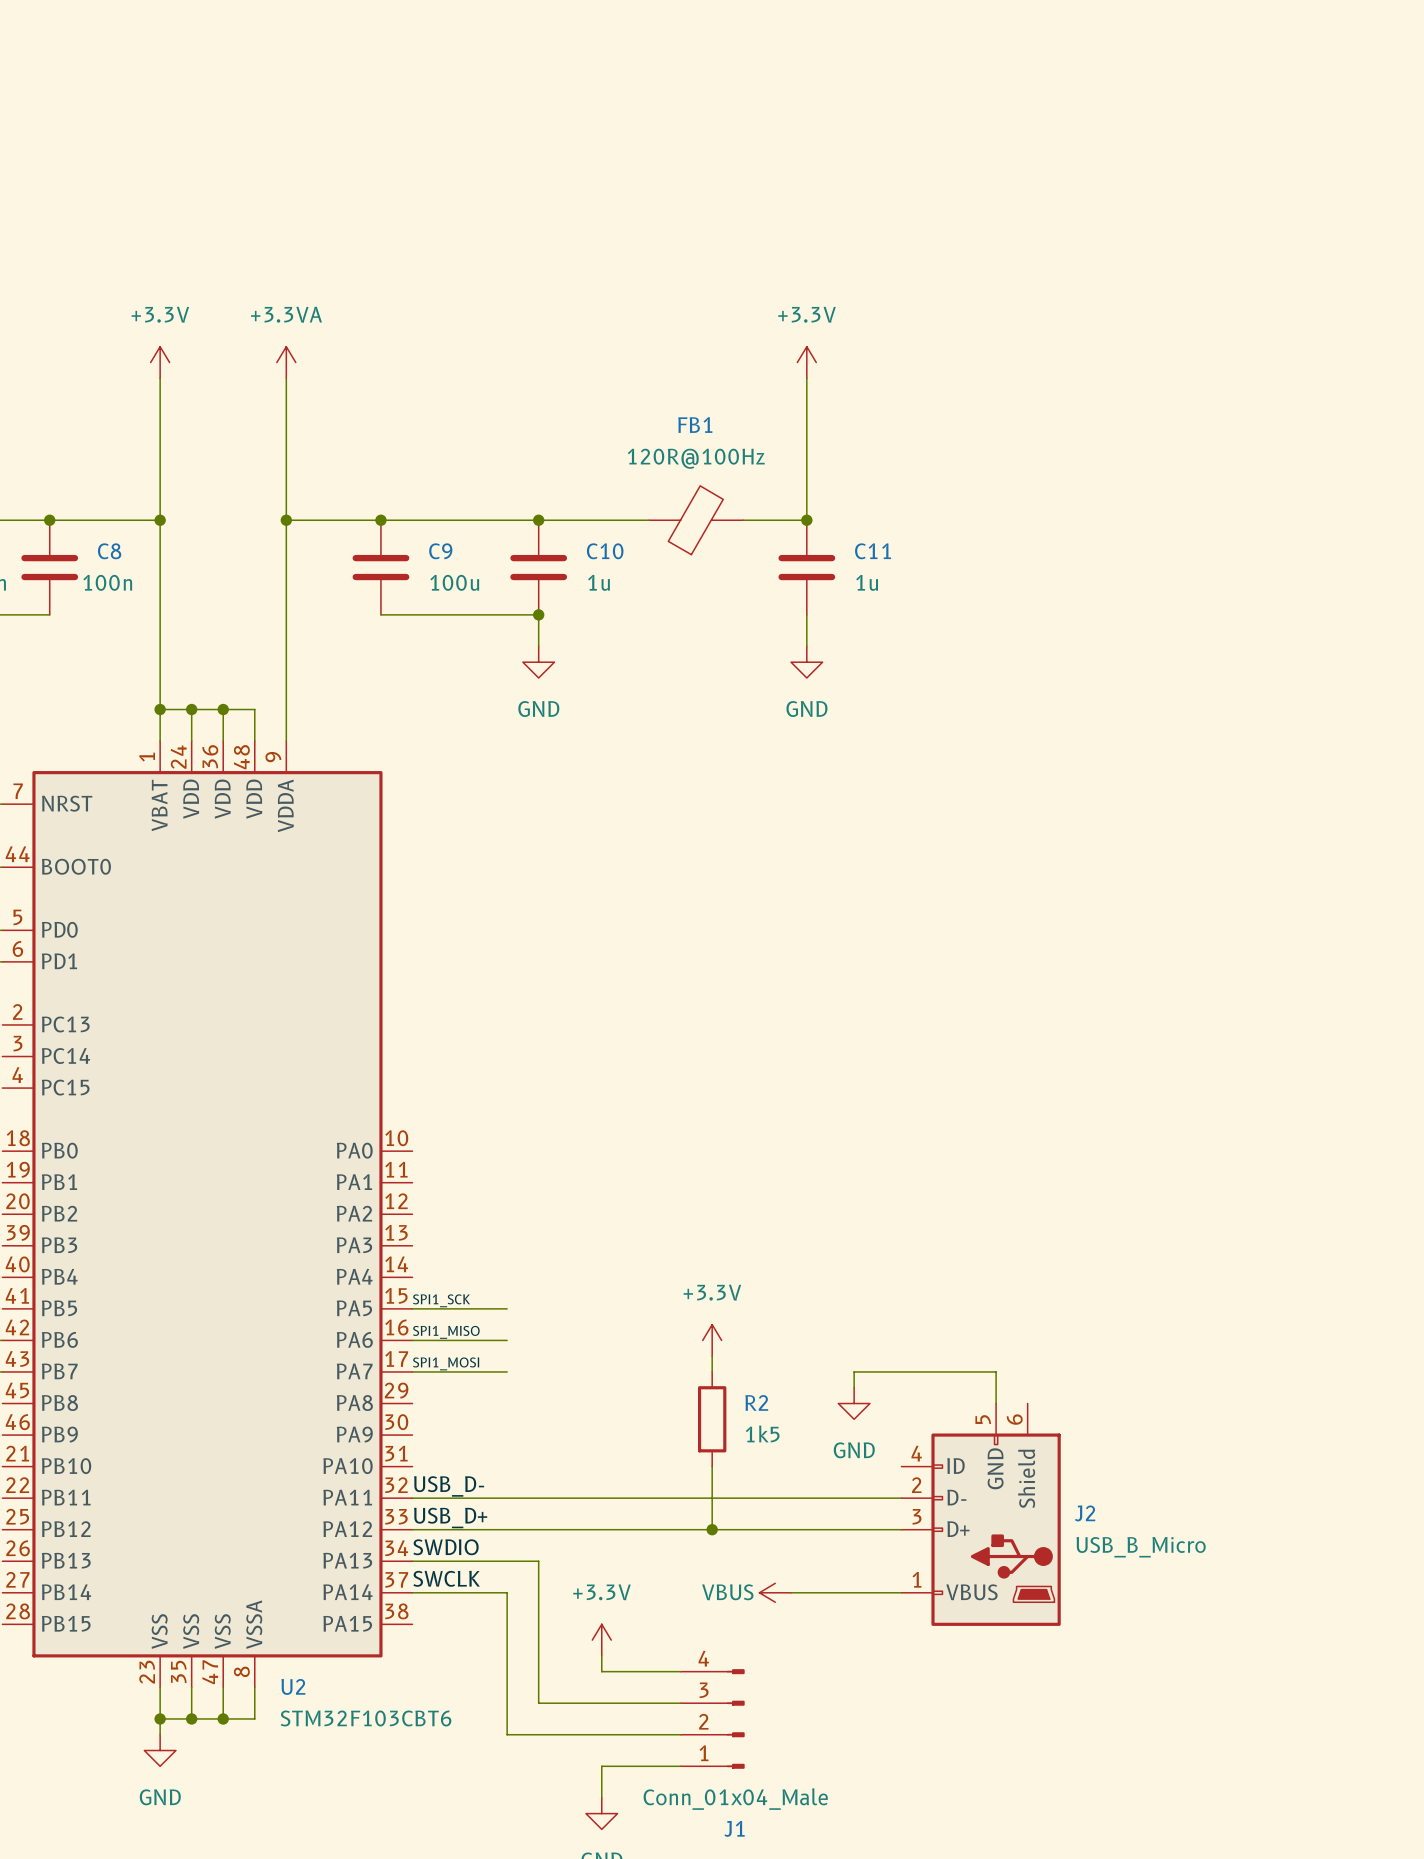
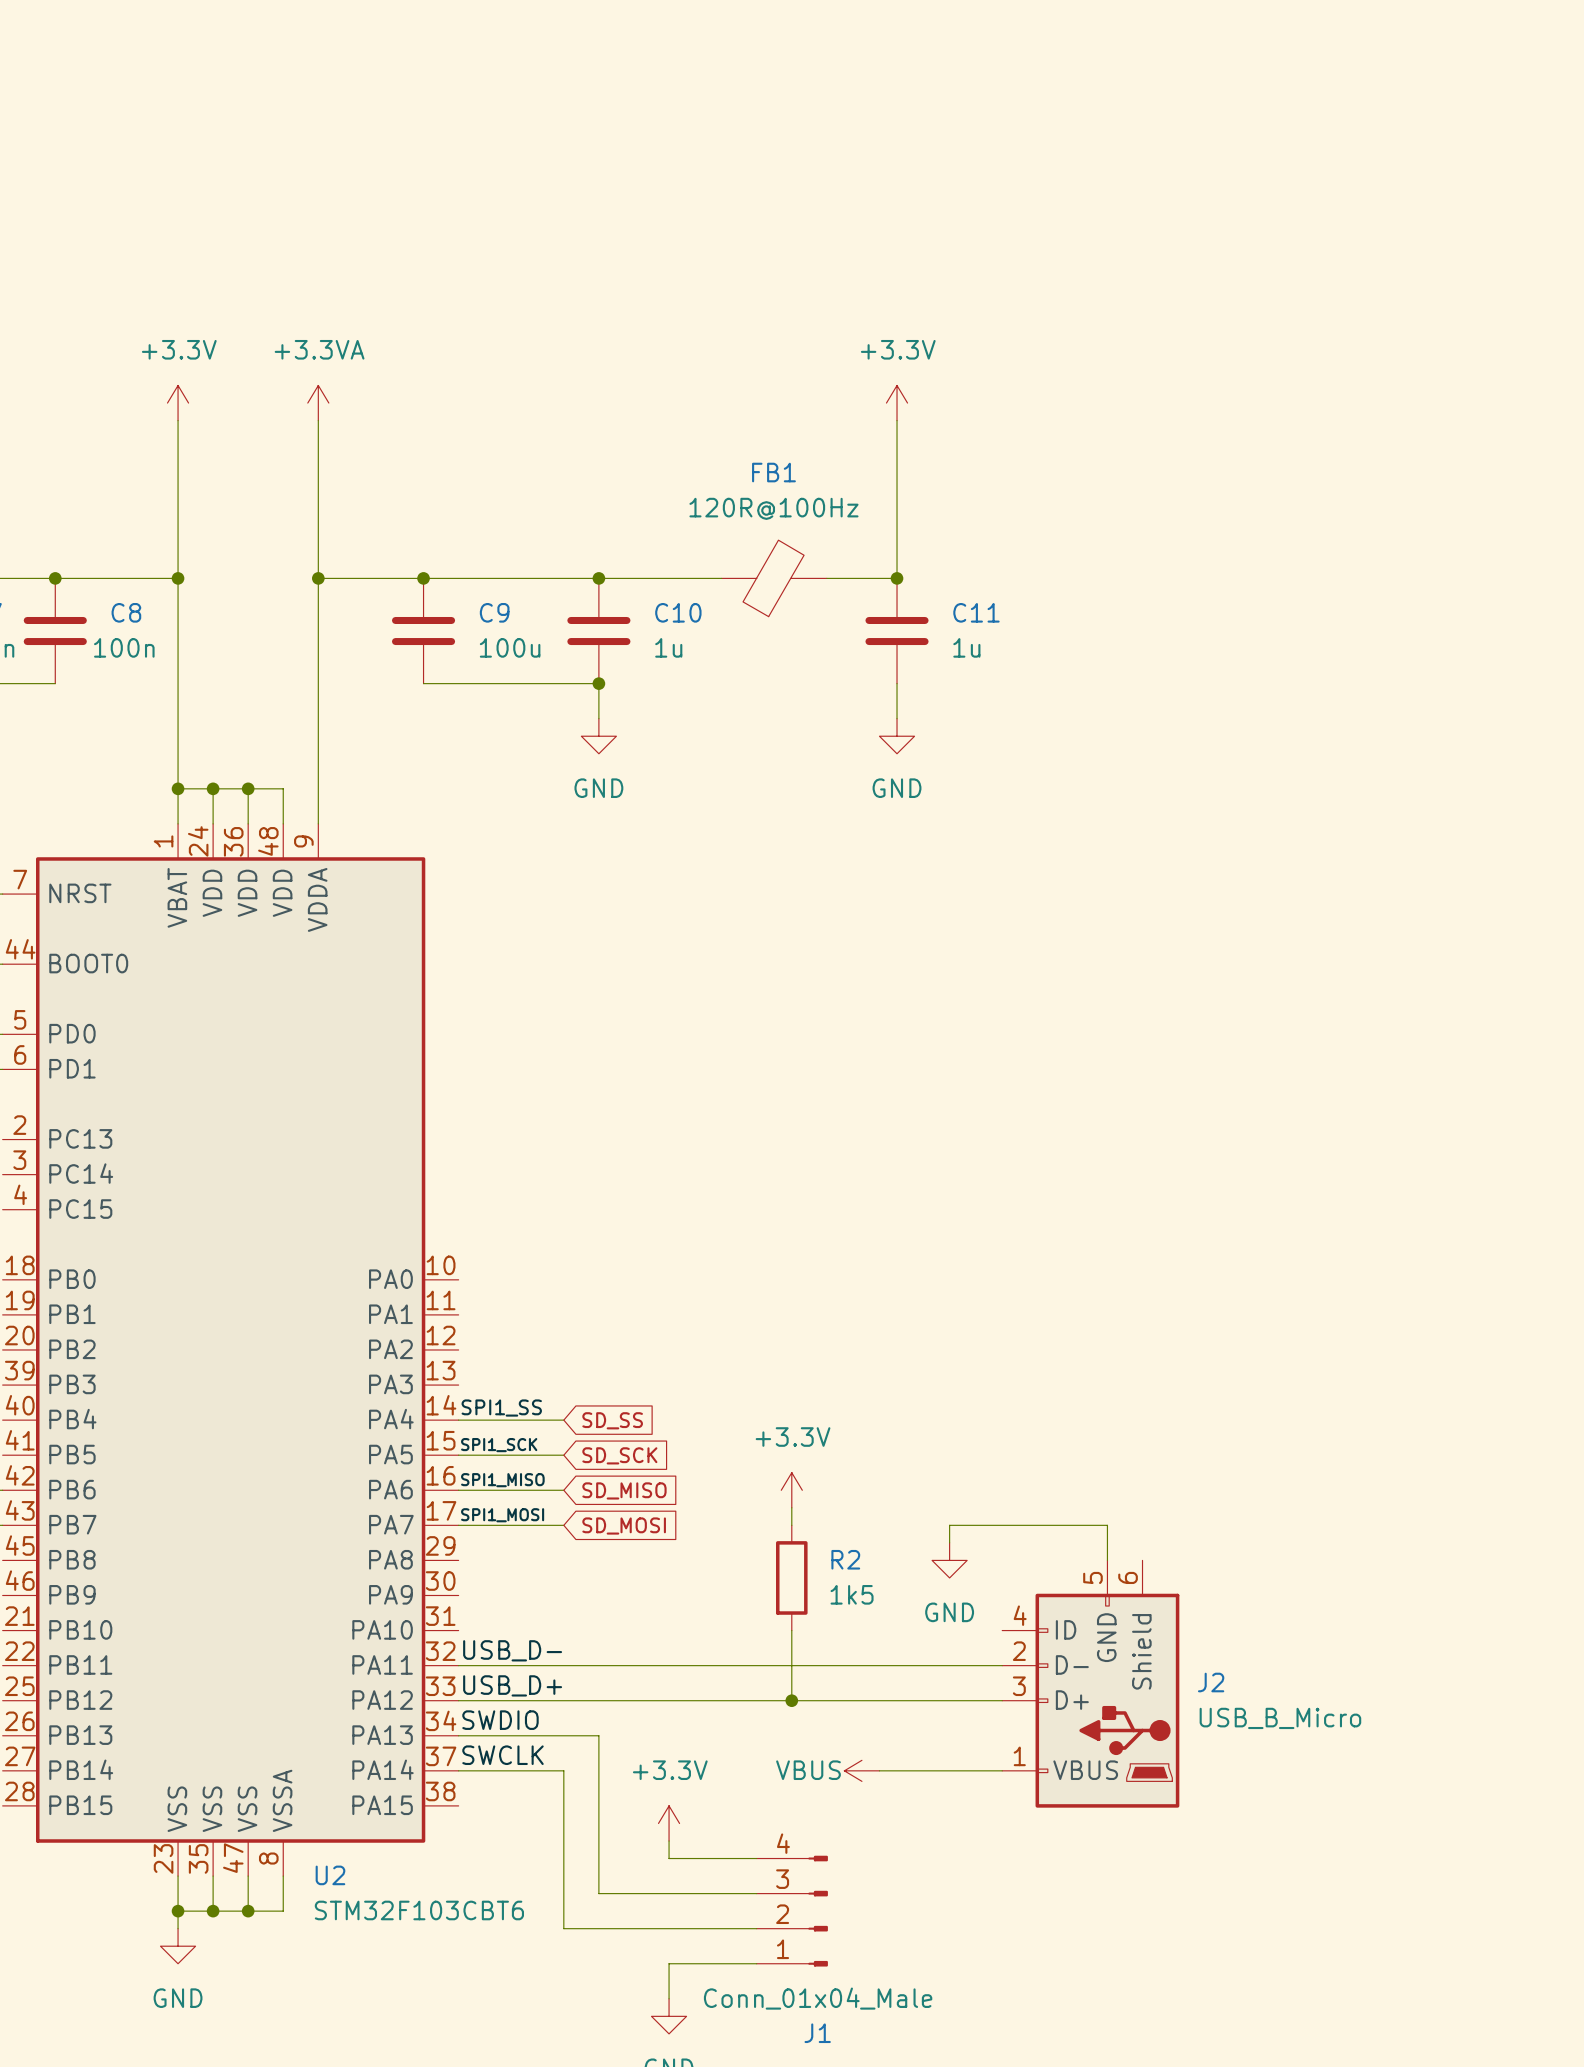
label: none -> SPI1_SS (501, 1408)
wire: none -> (458, 1420) (563, 1420)
global label: none -> SD_SS (612, 1420)
global label: none -> SD_SCK (619, 1455)
global label: none -> SD_MISO (624, 1490)
global label: none -> SD_MOSI (624, 1526)

